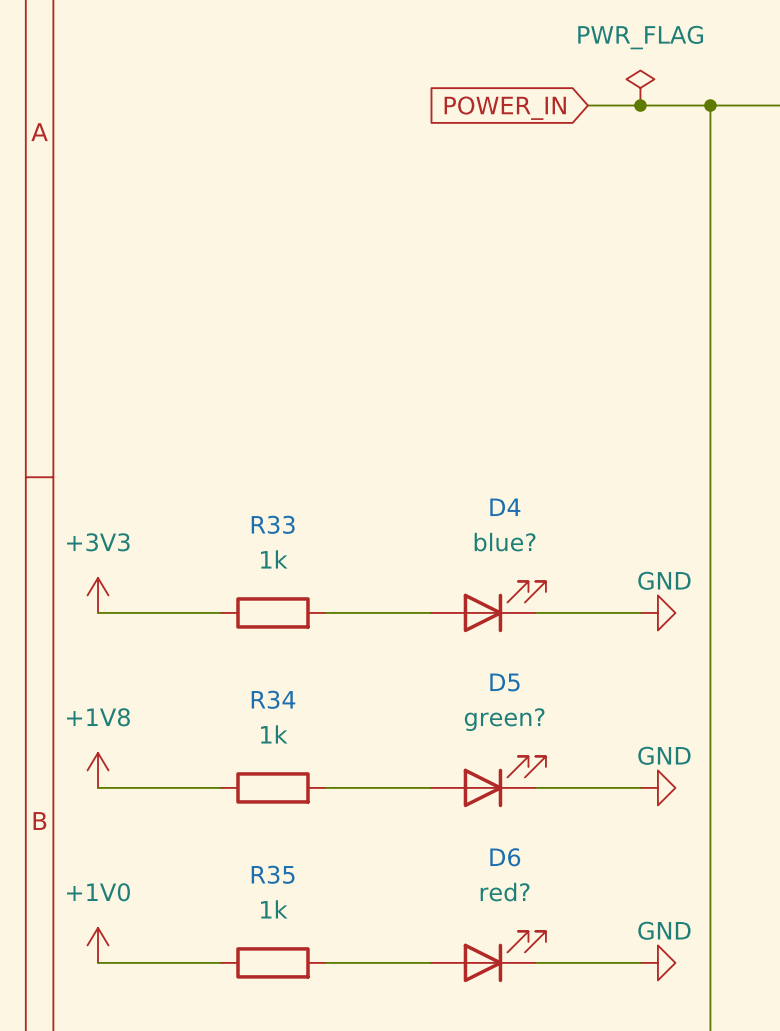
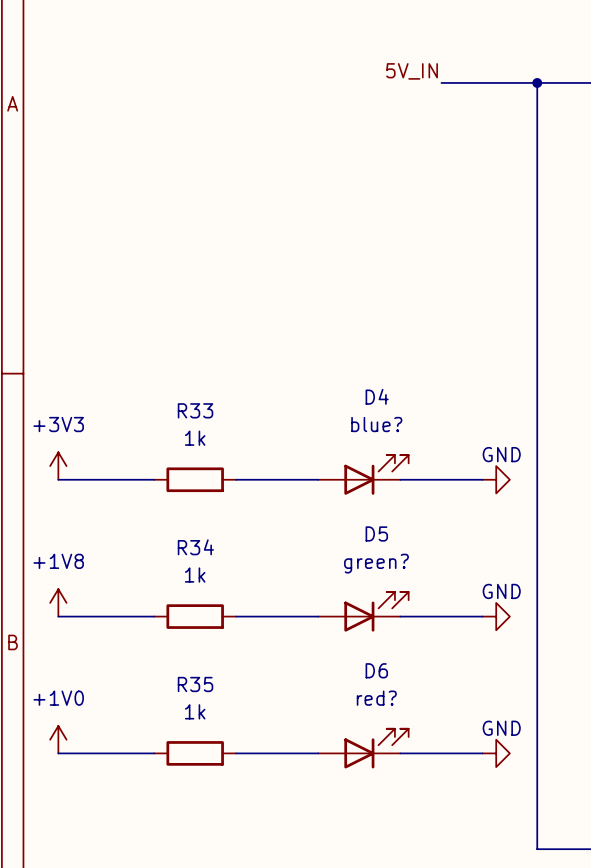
power symbol: PWR_FLAG (640, 88) -> none
label: none -> 5V_IN (412, 71)
junction: (640, 105) -> none
global label: POWER_IN (505, 108) -> none

